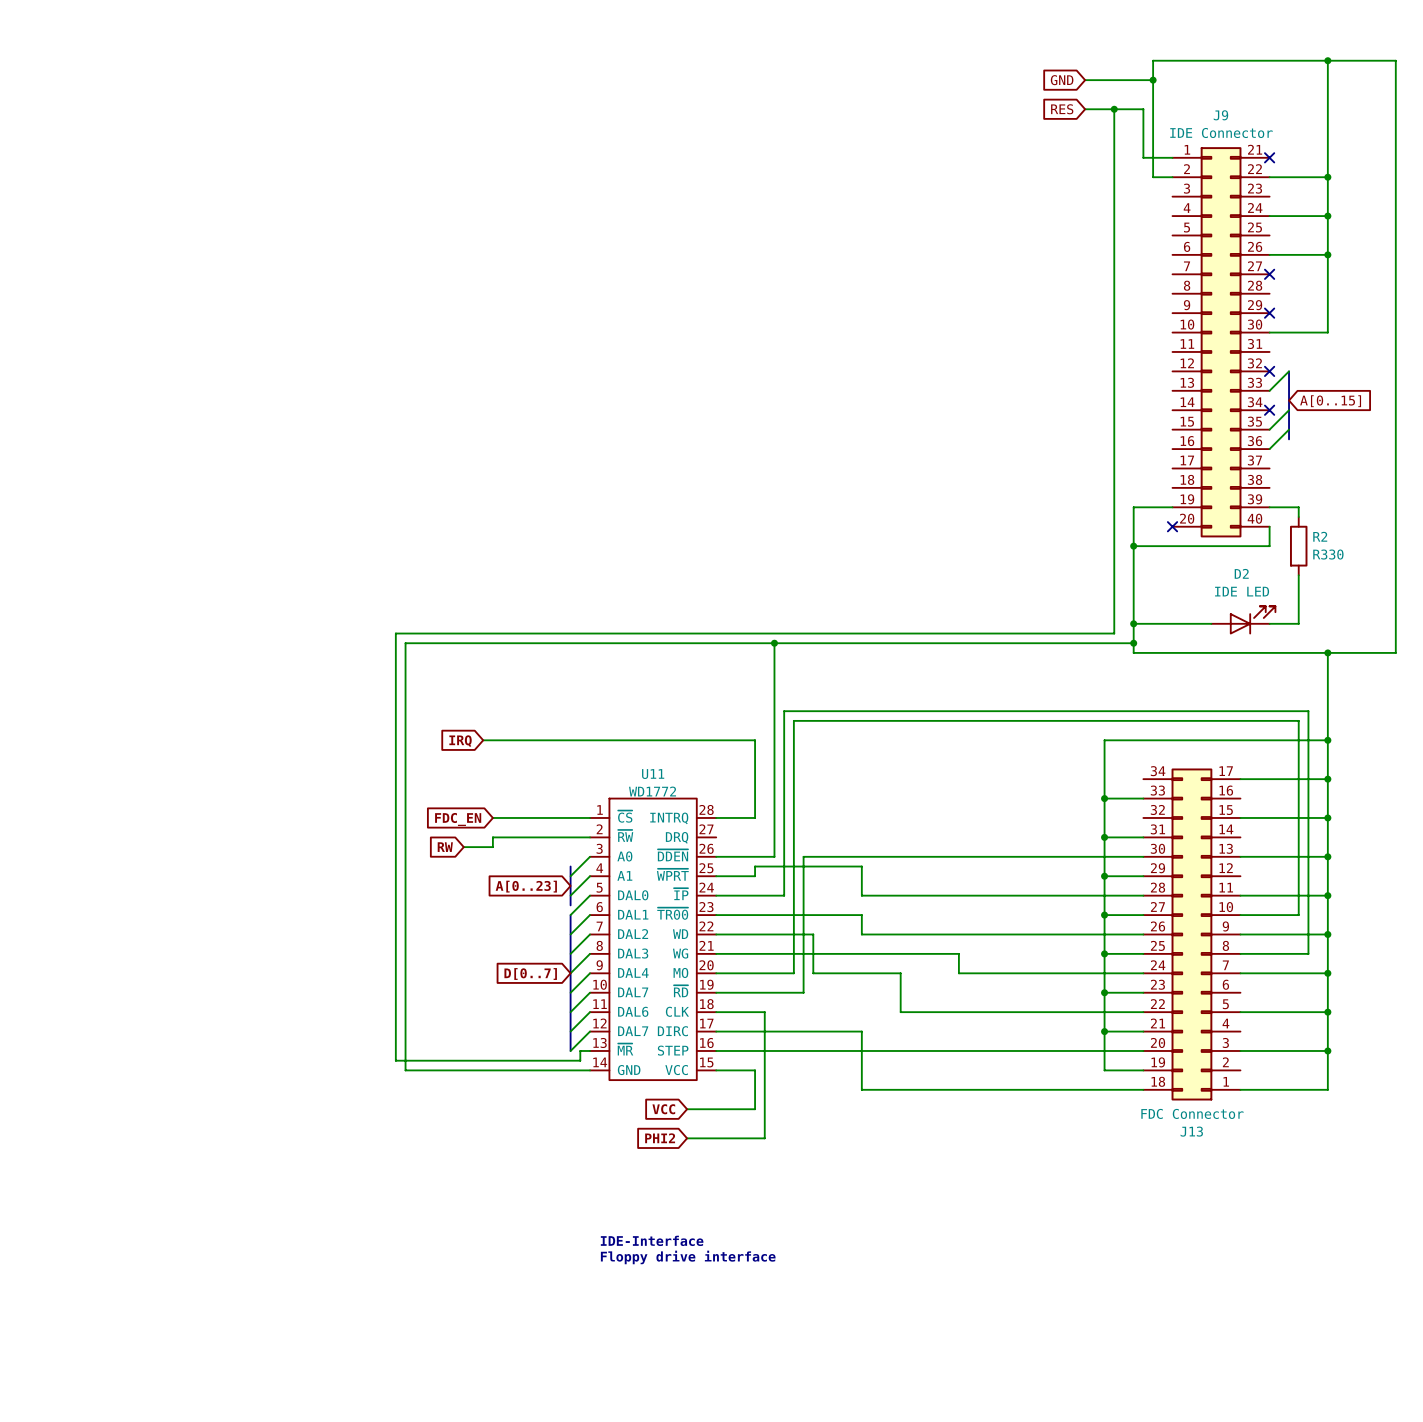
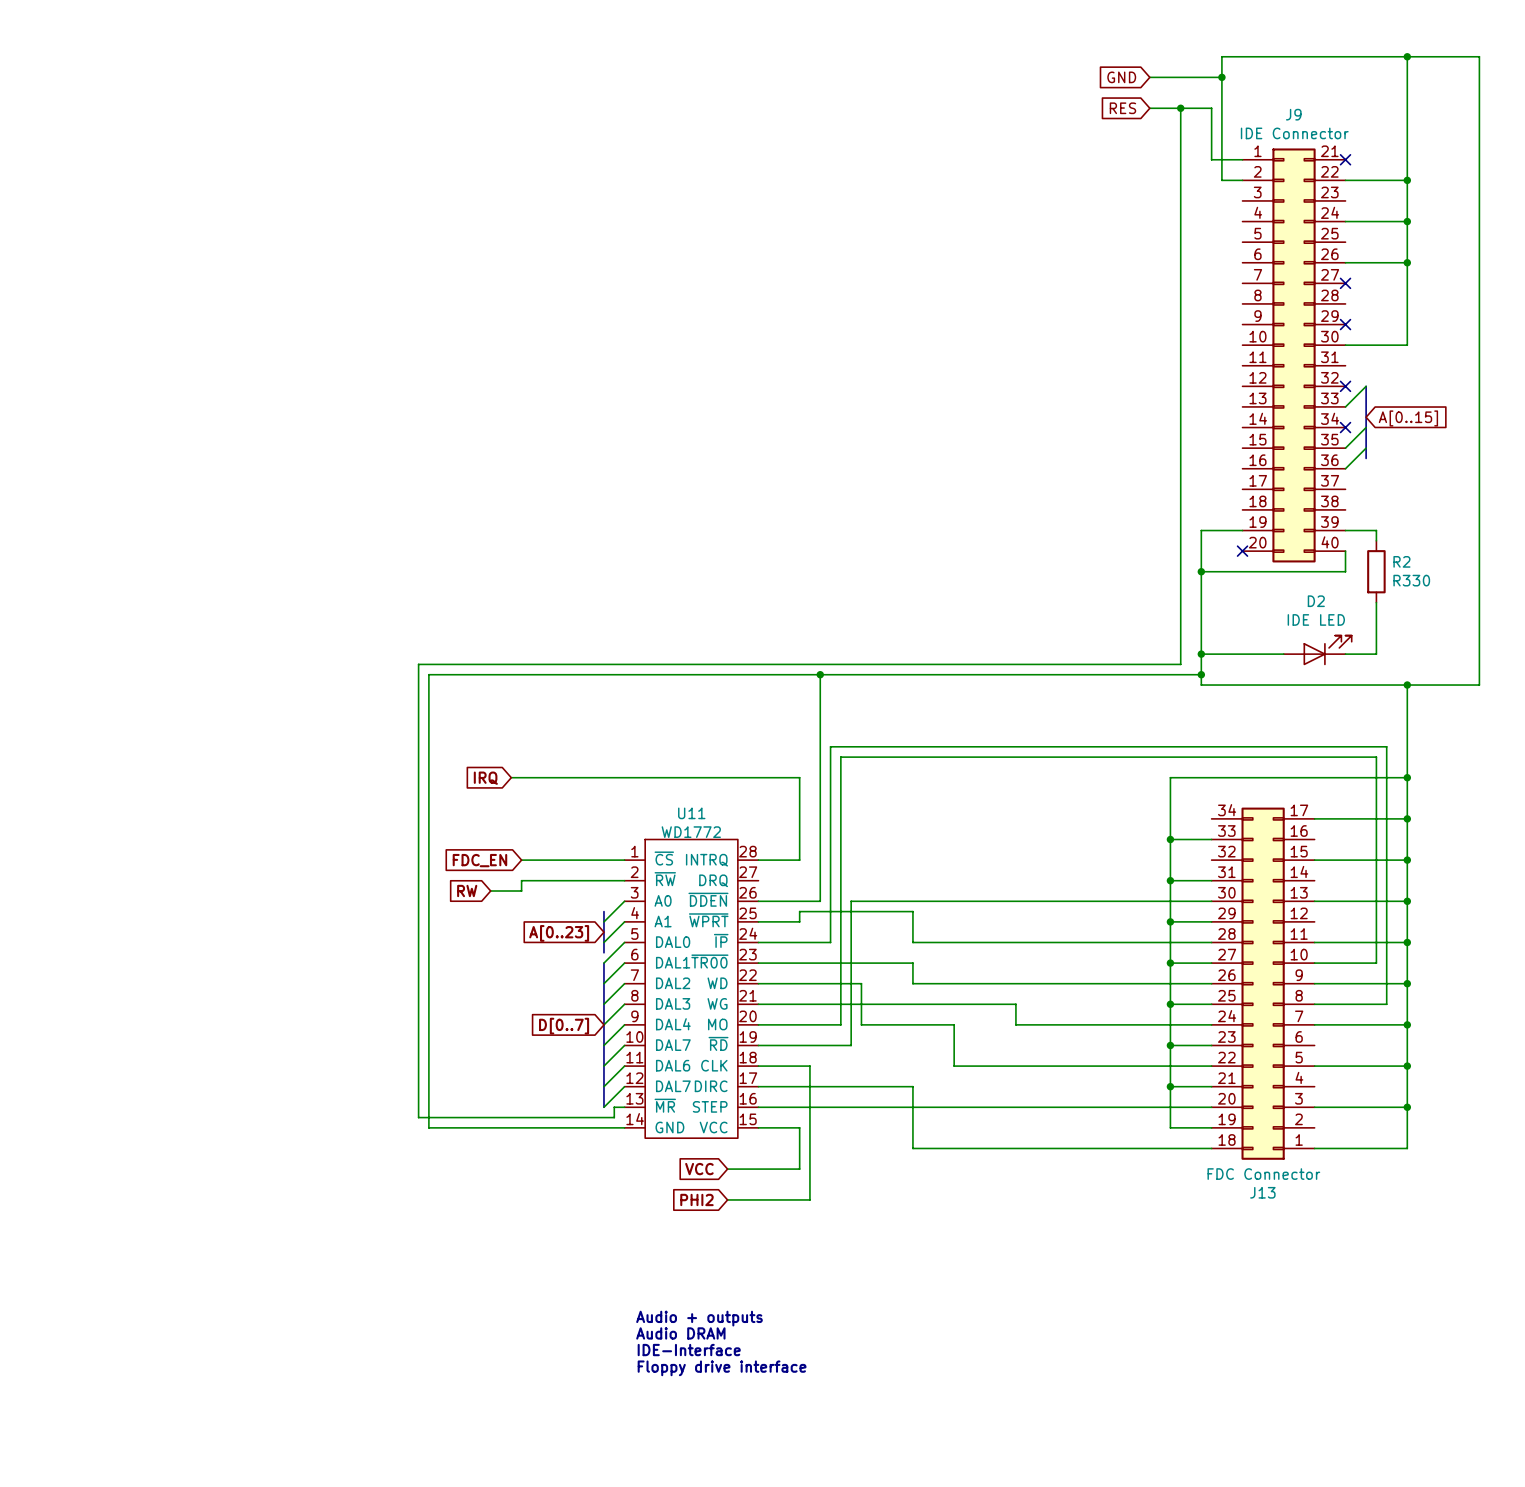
text position: IDE-Interface (652, 1240) -> IDE-Interface (689, 1350)
text: none -> Audio + outputs (699, 1318)
text position: Floppy drive interface (688, 1257) -> Floppy drive interface (722, 1368)
text: none -> Audio DRAM (680, 1333)

